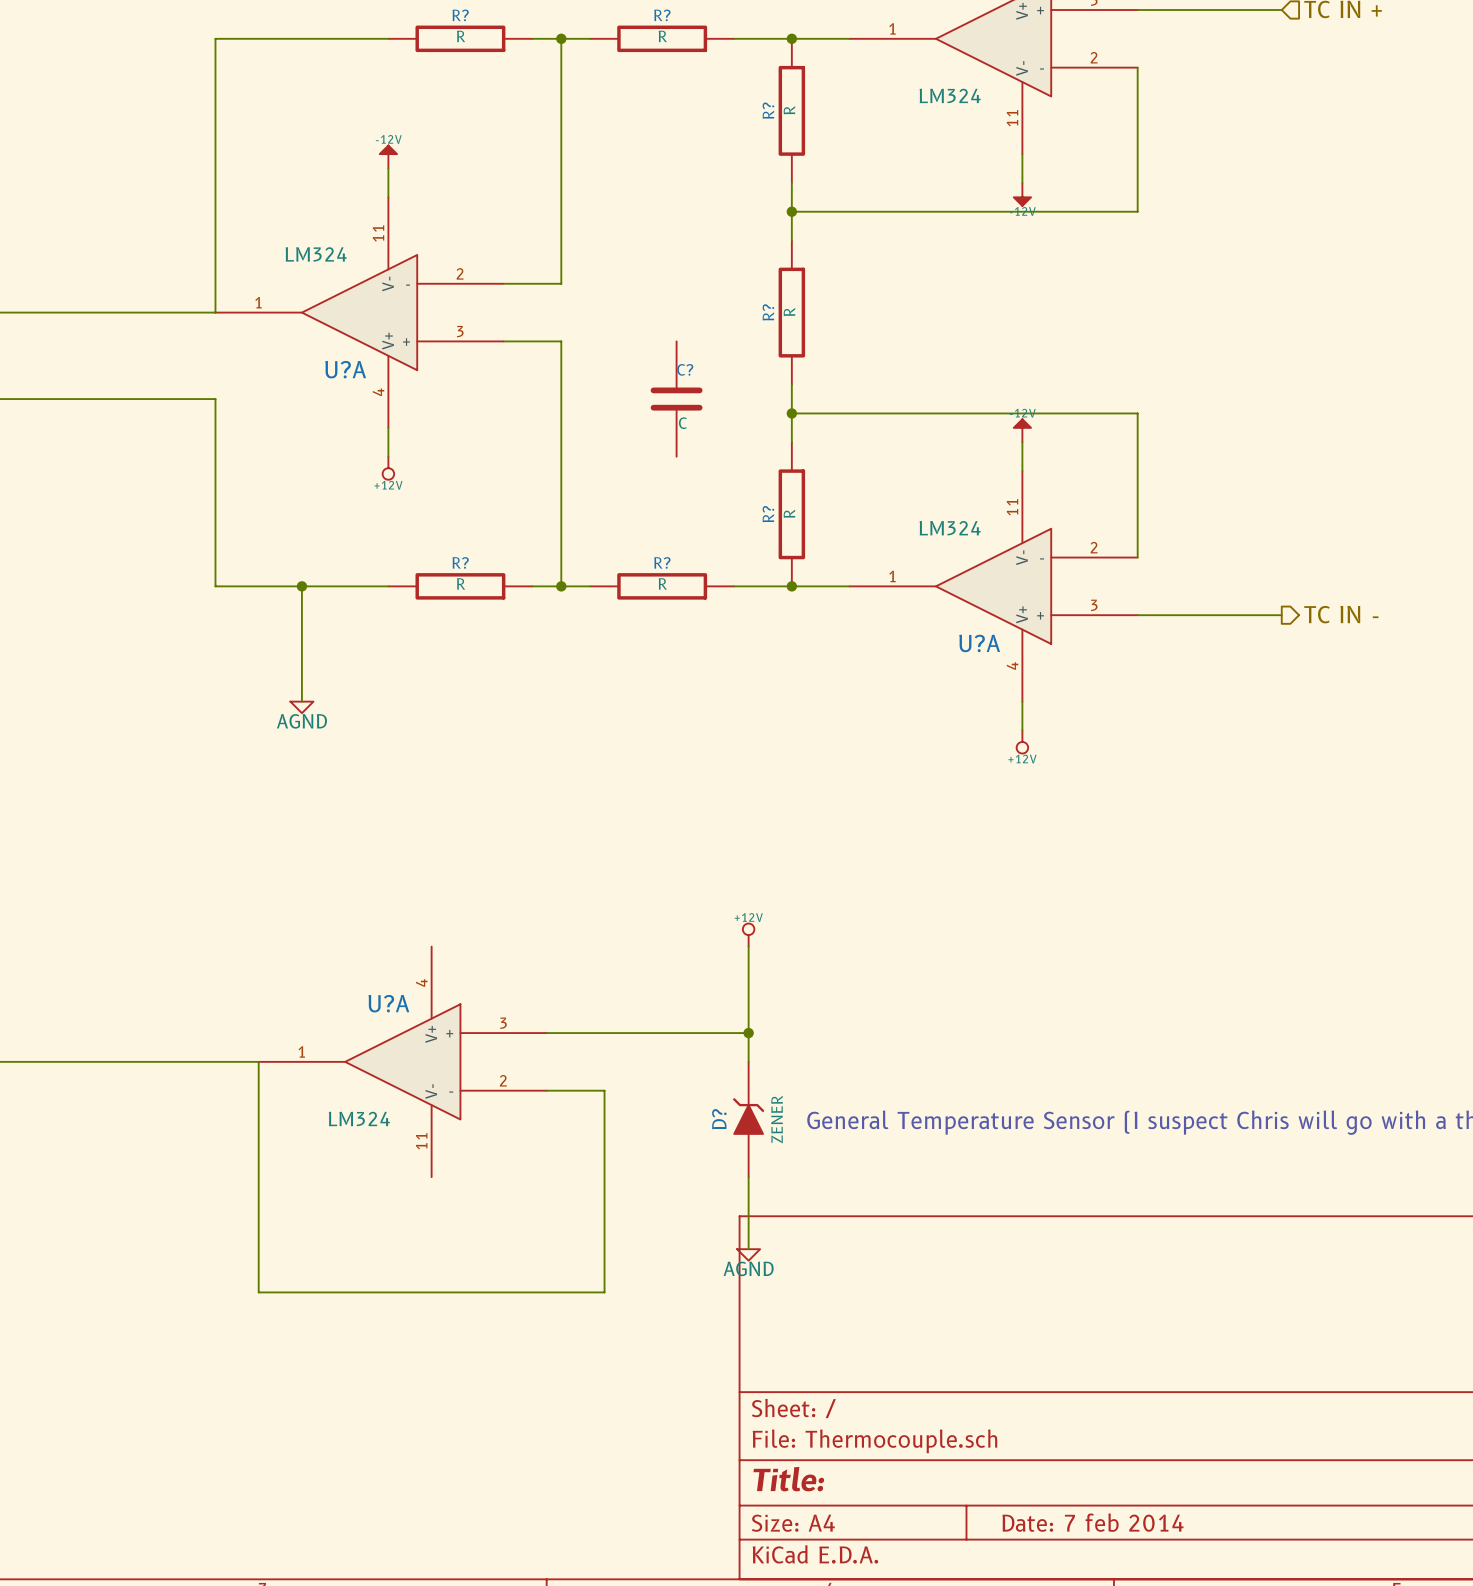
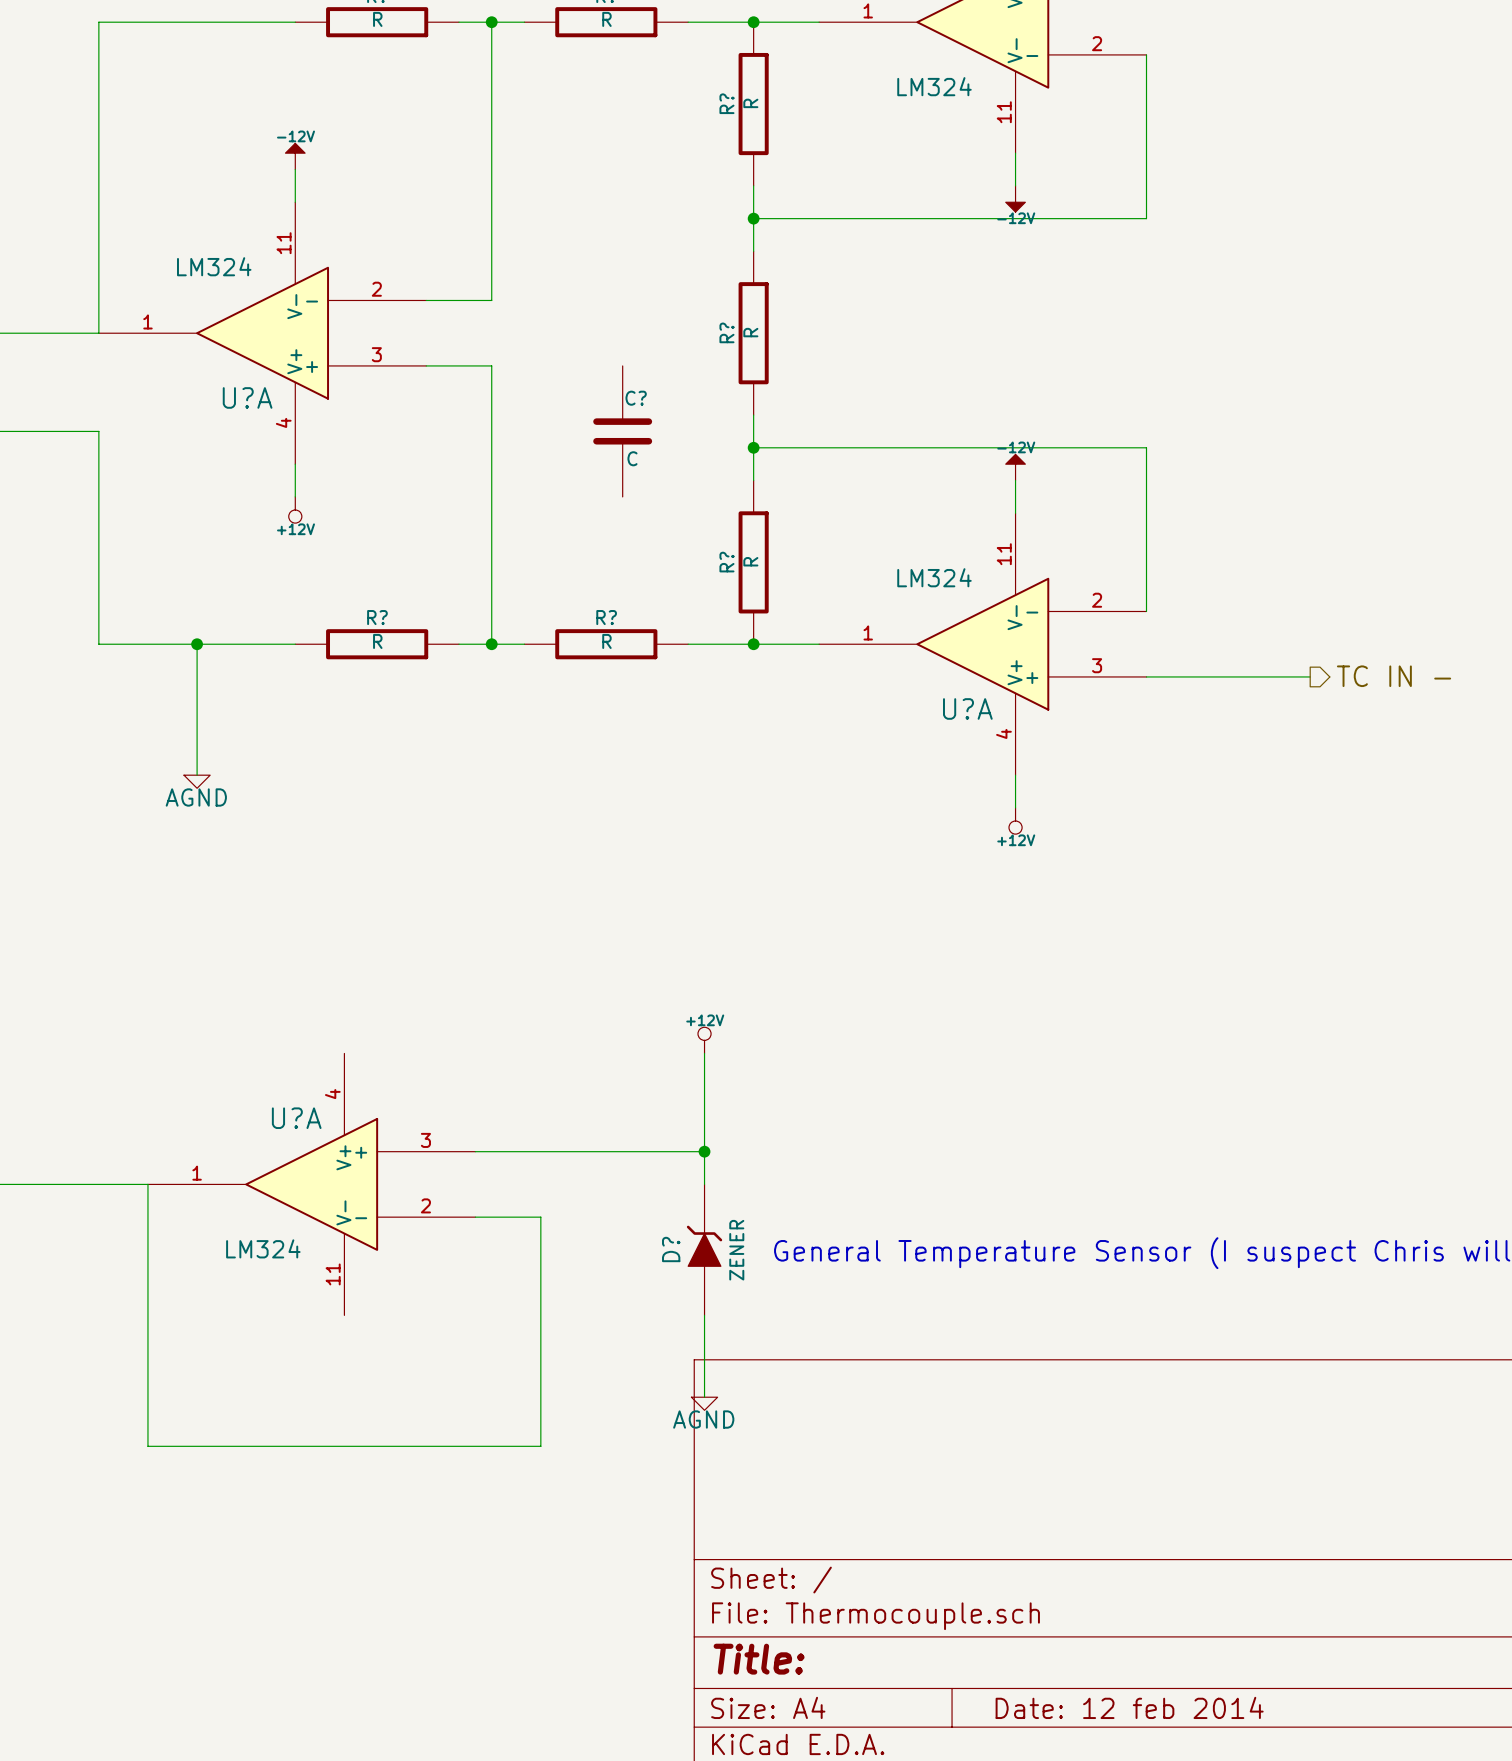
title block: Date: 7 feb 2014 (1093, 1522) -> Date: 12 feb 2014 (1129, 1707)

